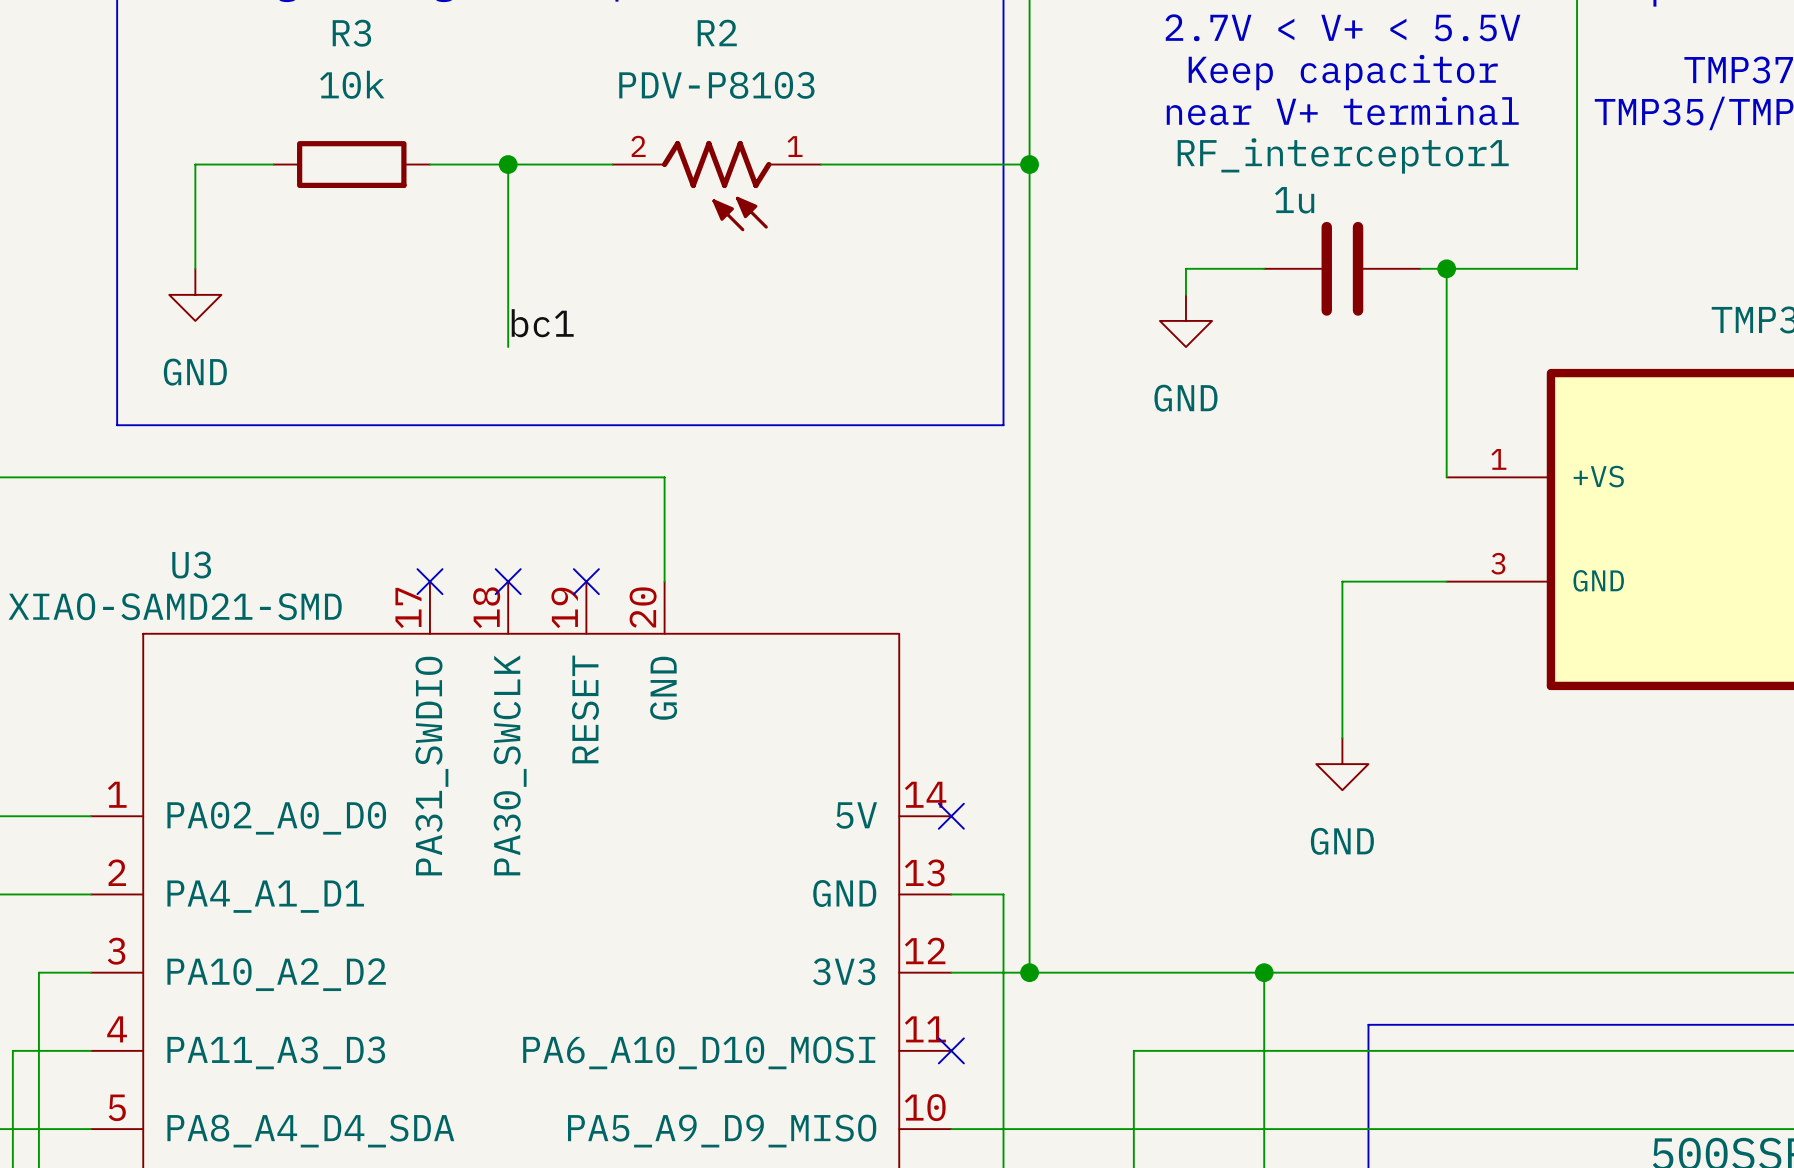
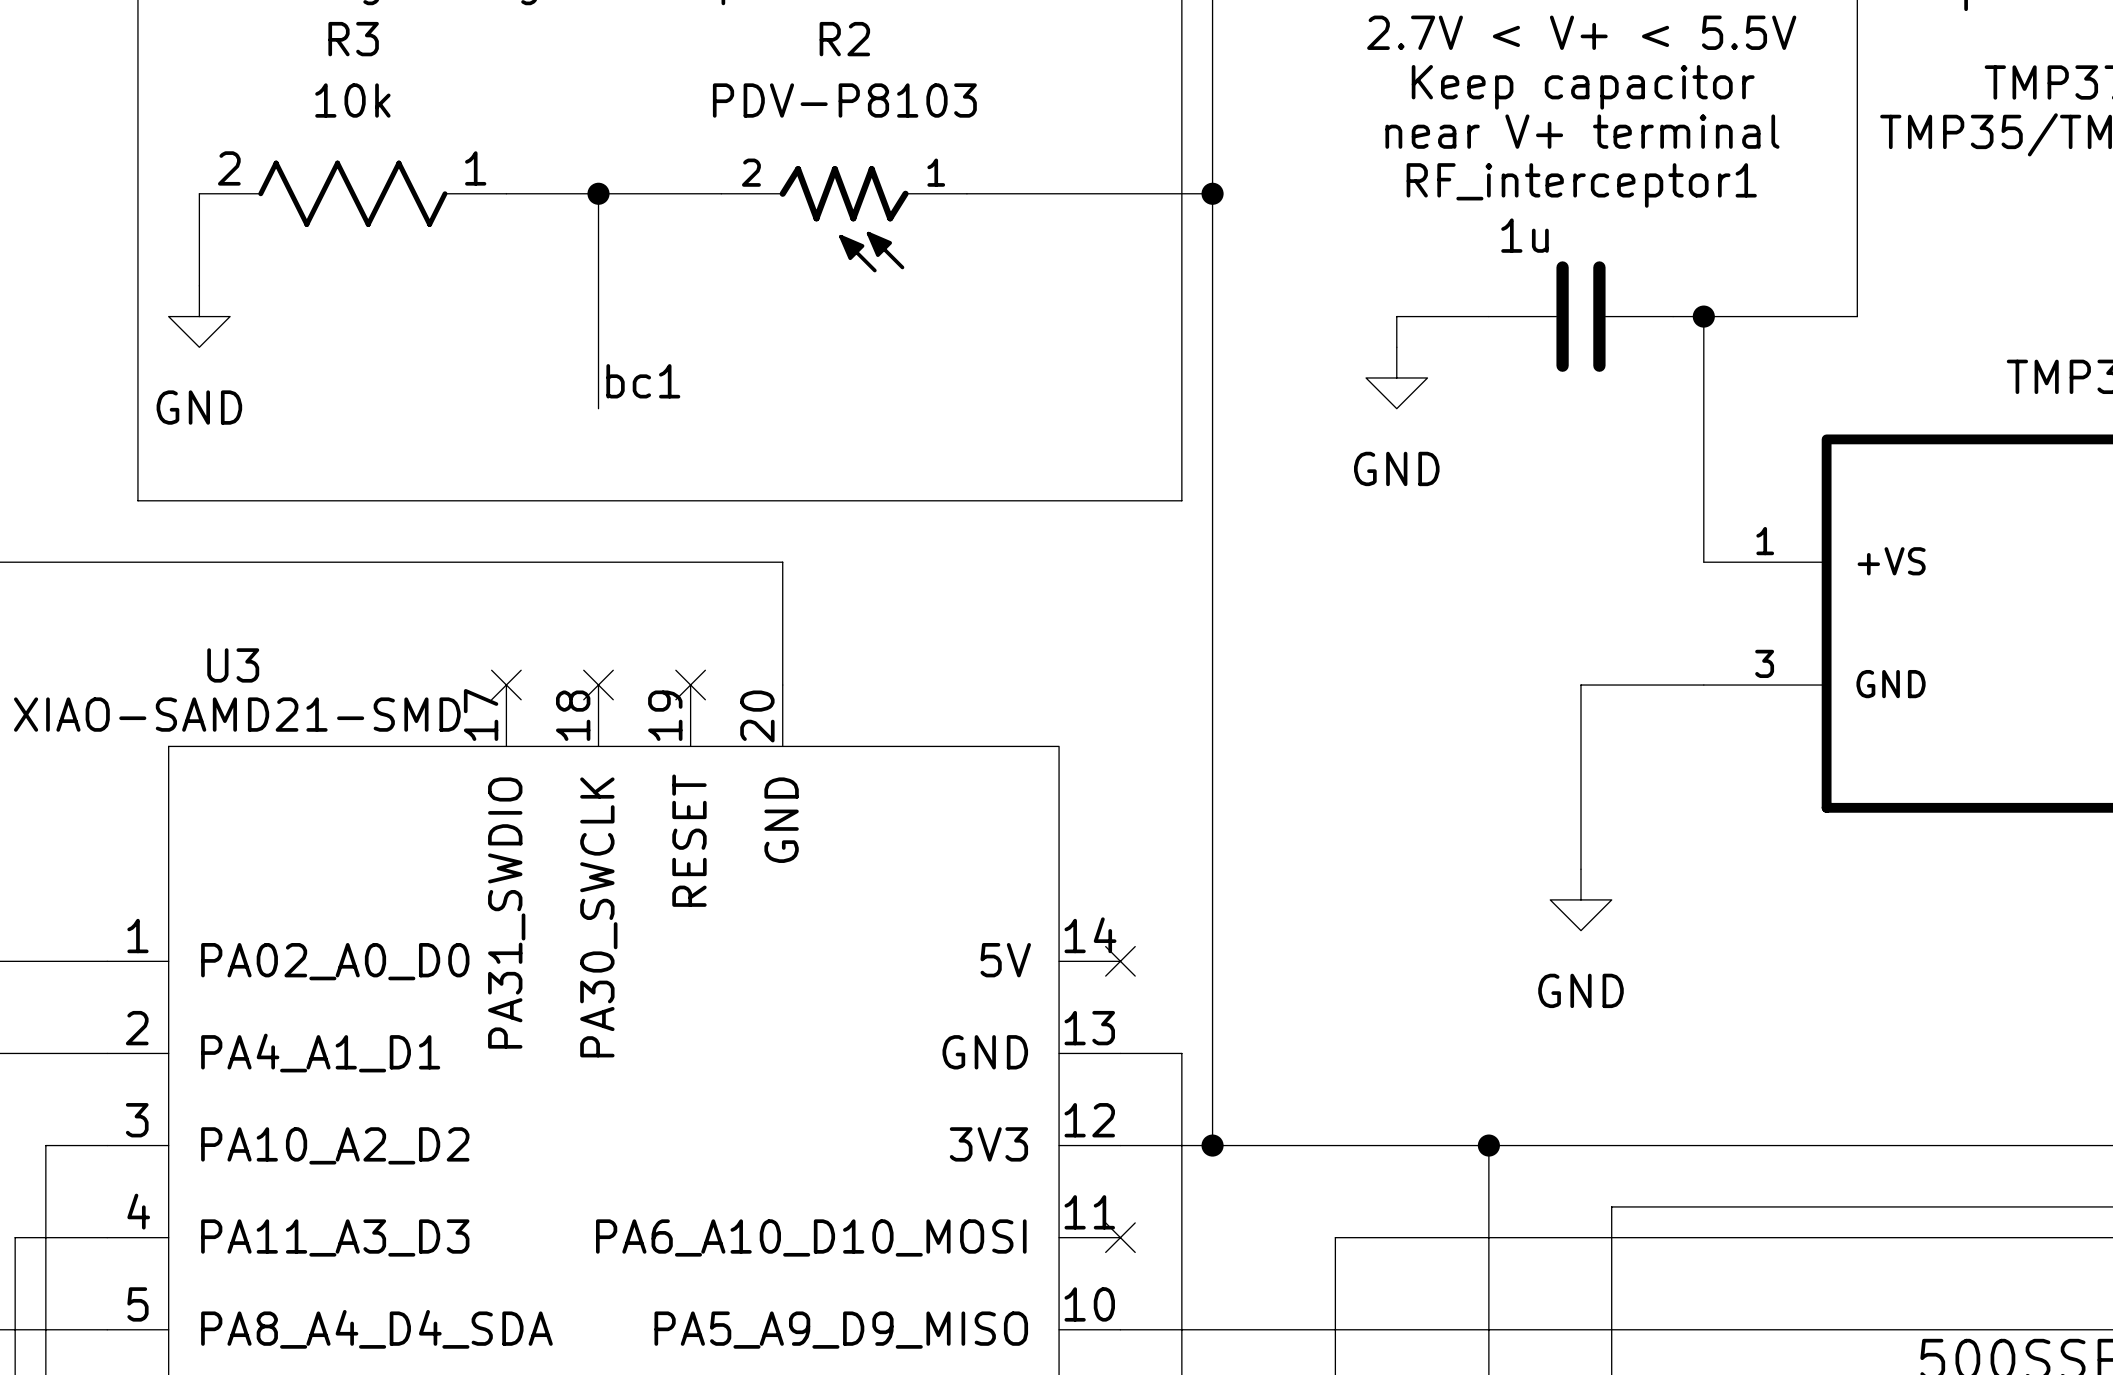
R3 symbol: [273, 141, 430, 188] -> [199, 160, 507, 227]
wire: none -> (199, 193) (199, 285)
wire: (273, 164) (195, 164) (195, 268) -> none
power symbol position: GND (195, 294) -> GND (199, 316)

